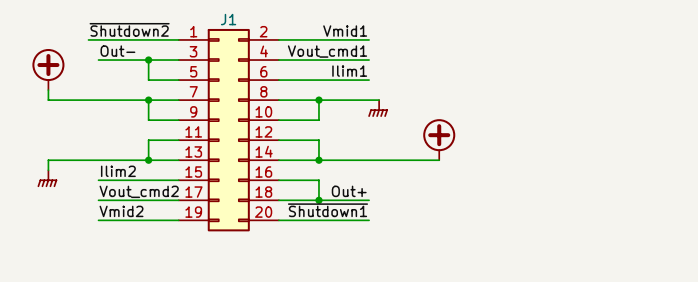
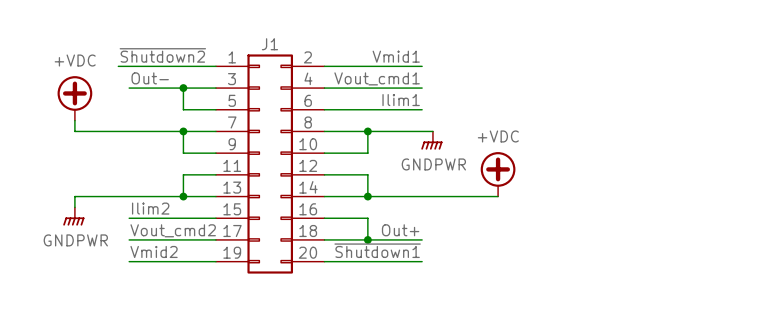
power symbol text: none -> +VDC (75, 60)
power symbol text: none -> +VDC (498, 136)
power symbol text: none -> GNDPWR (433, 164)
power symbol text: none -> GNDPWR (75, 240)

